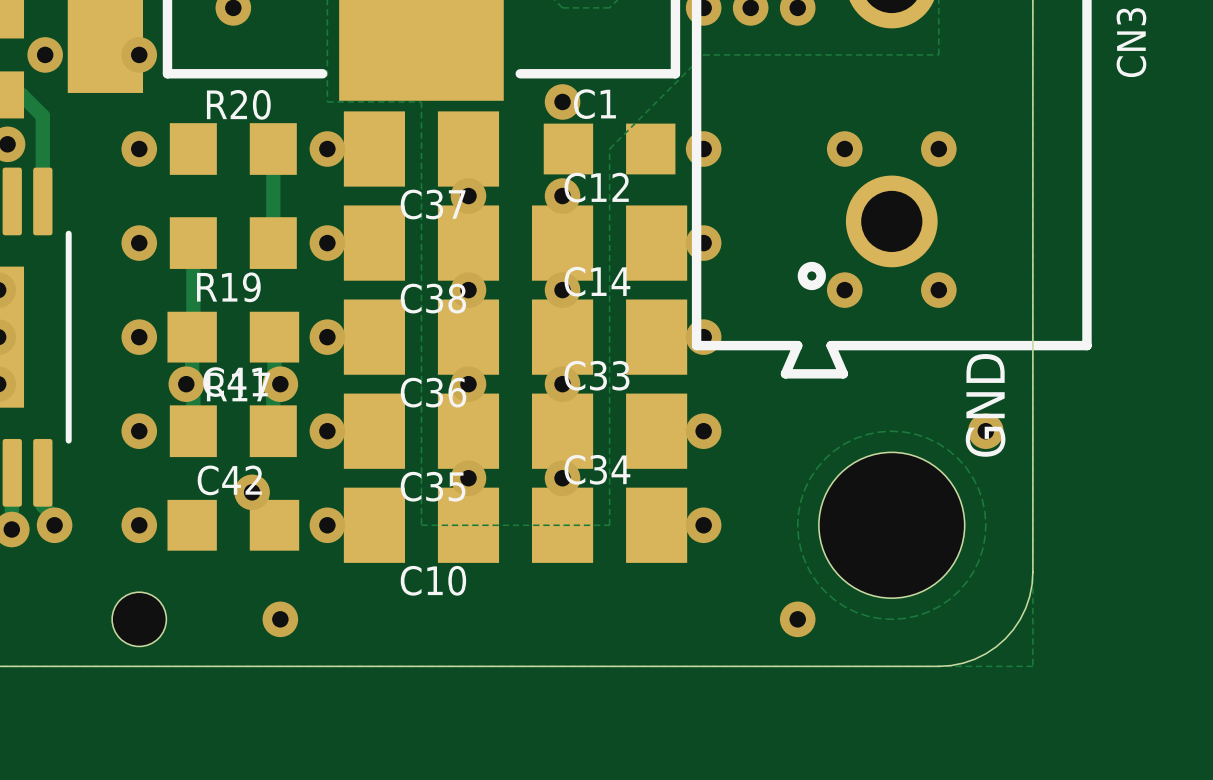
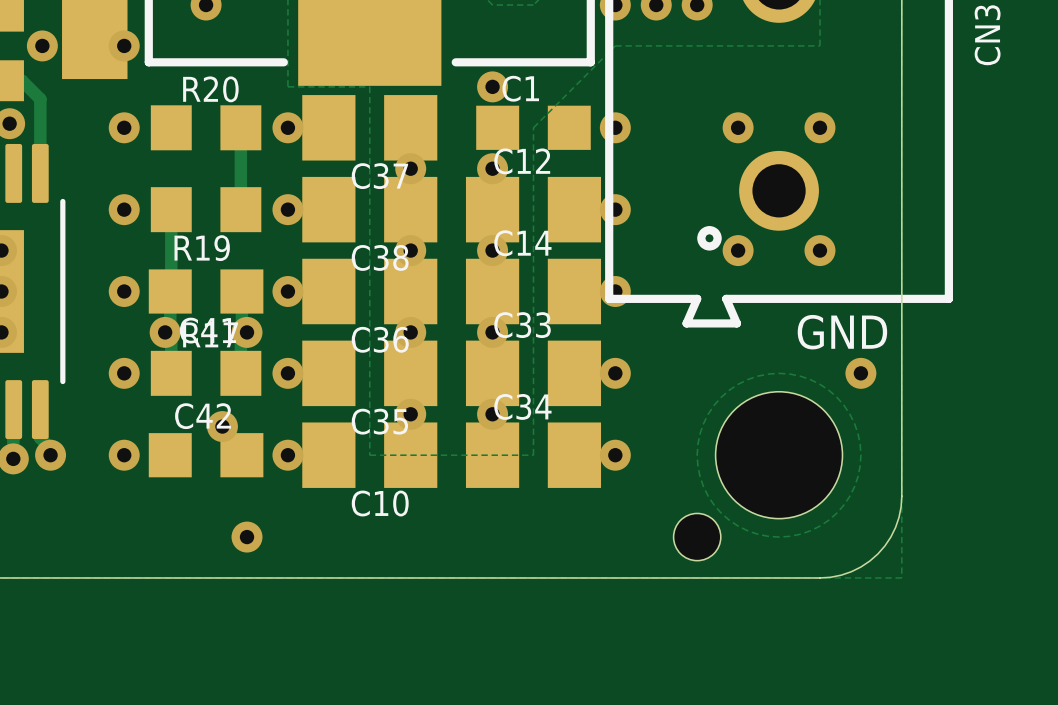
text rotation: 0° (985, 405) -> 90° clockwise (842, 332)
part position: (139, 619) -> (697, 537)
via: (797, 619) -> none

